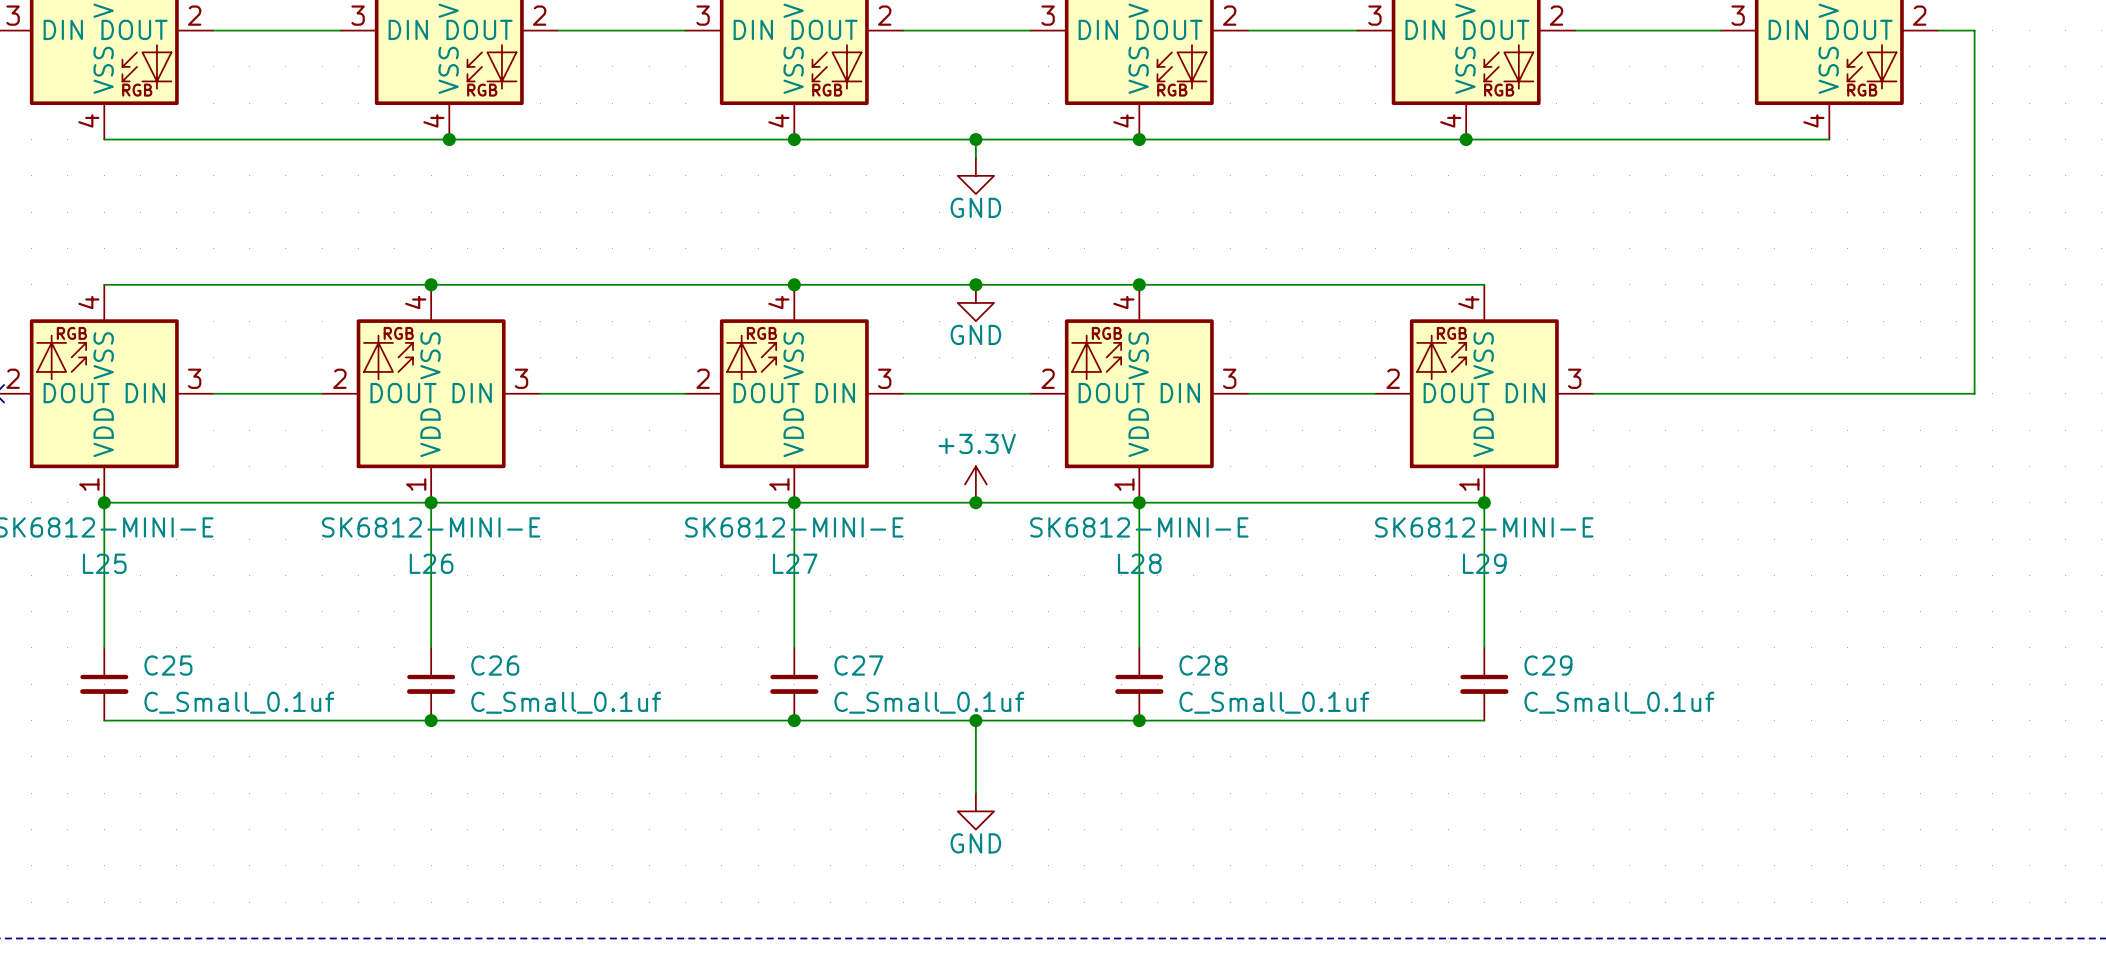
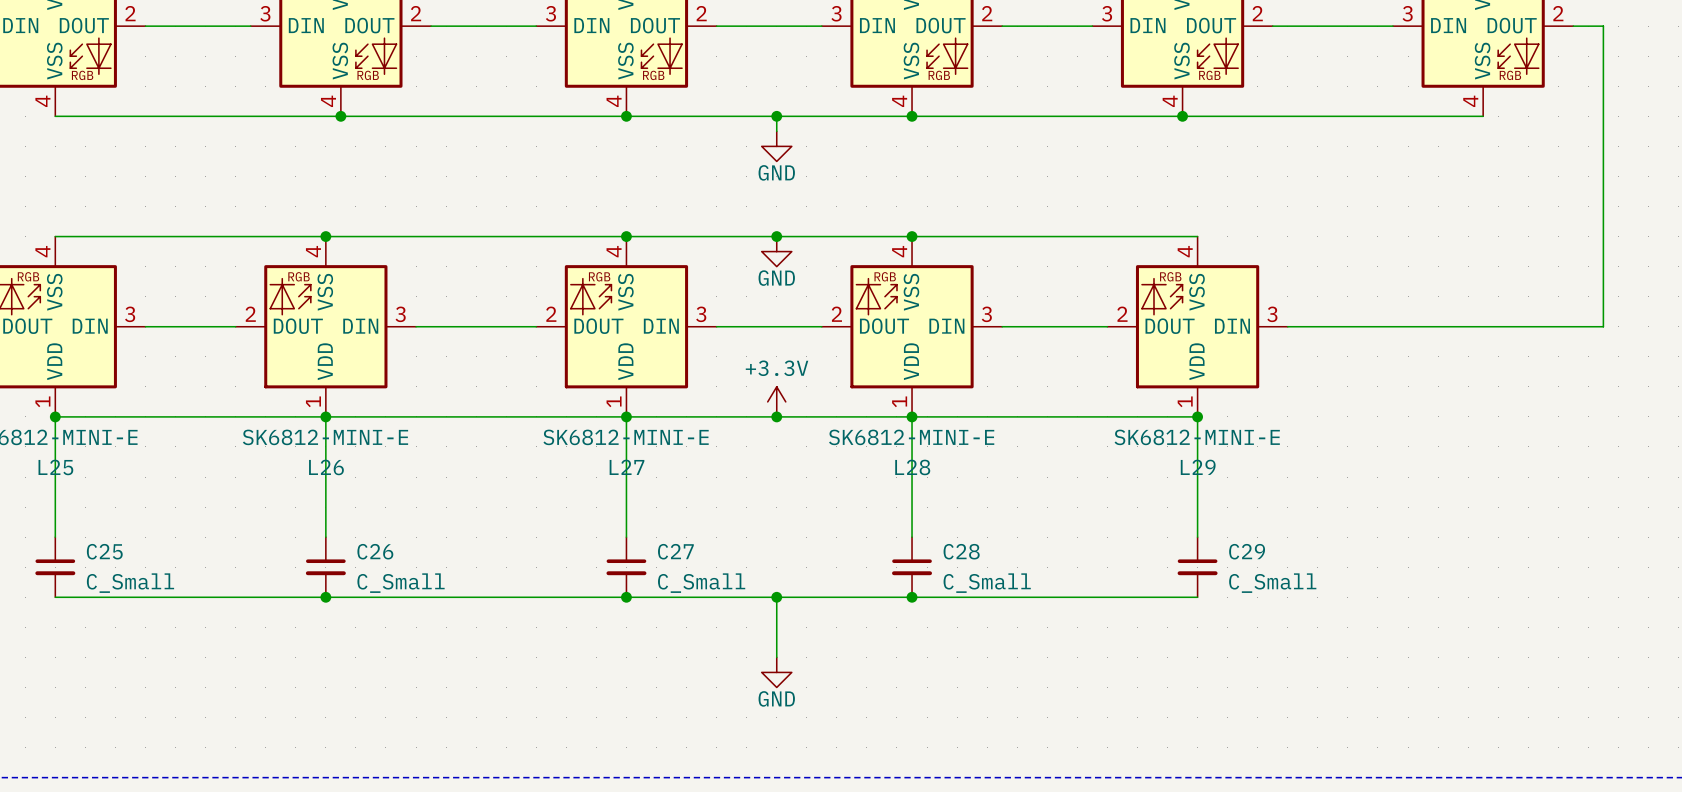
C25 value: C_Small_0.1uf (239, 702) -> C_Small (130, 583)
C26 value: C_Small_0.1uf (566, 702) -> C_Small (401, 583)
C27 value: C_Small_0.1uf (929, 702) -> C_Small (701, 583)
C28 value: C_Small_0.1uf (1274, 702) -> C_Small (987, 583)
C29 value: C_Small_0.1uf (1619, 702) -> C_Small (1272, 583)

